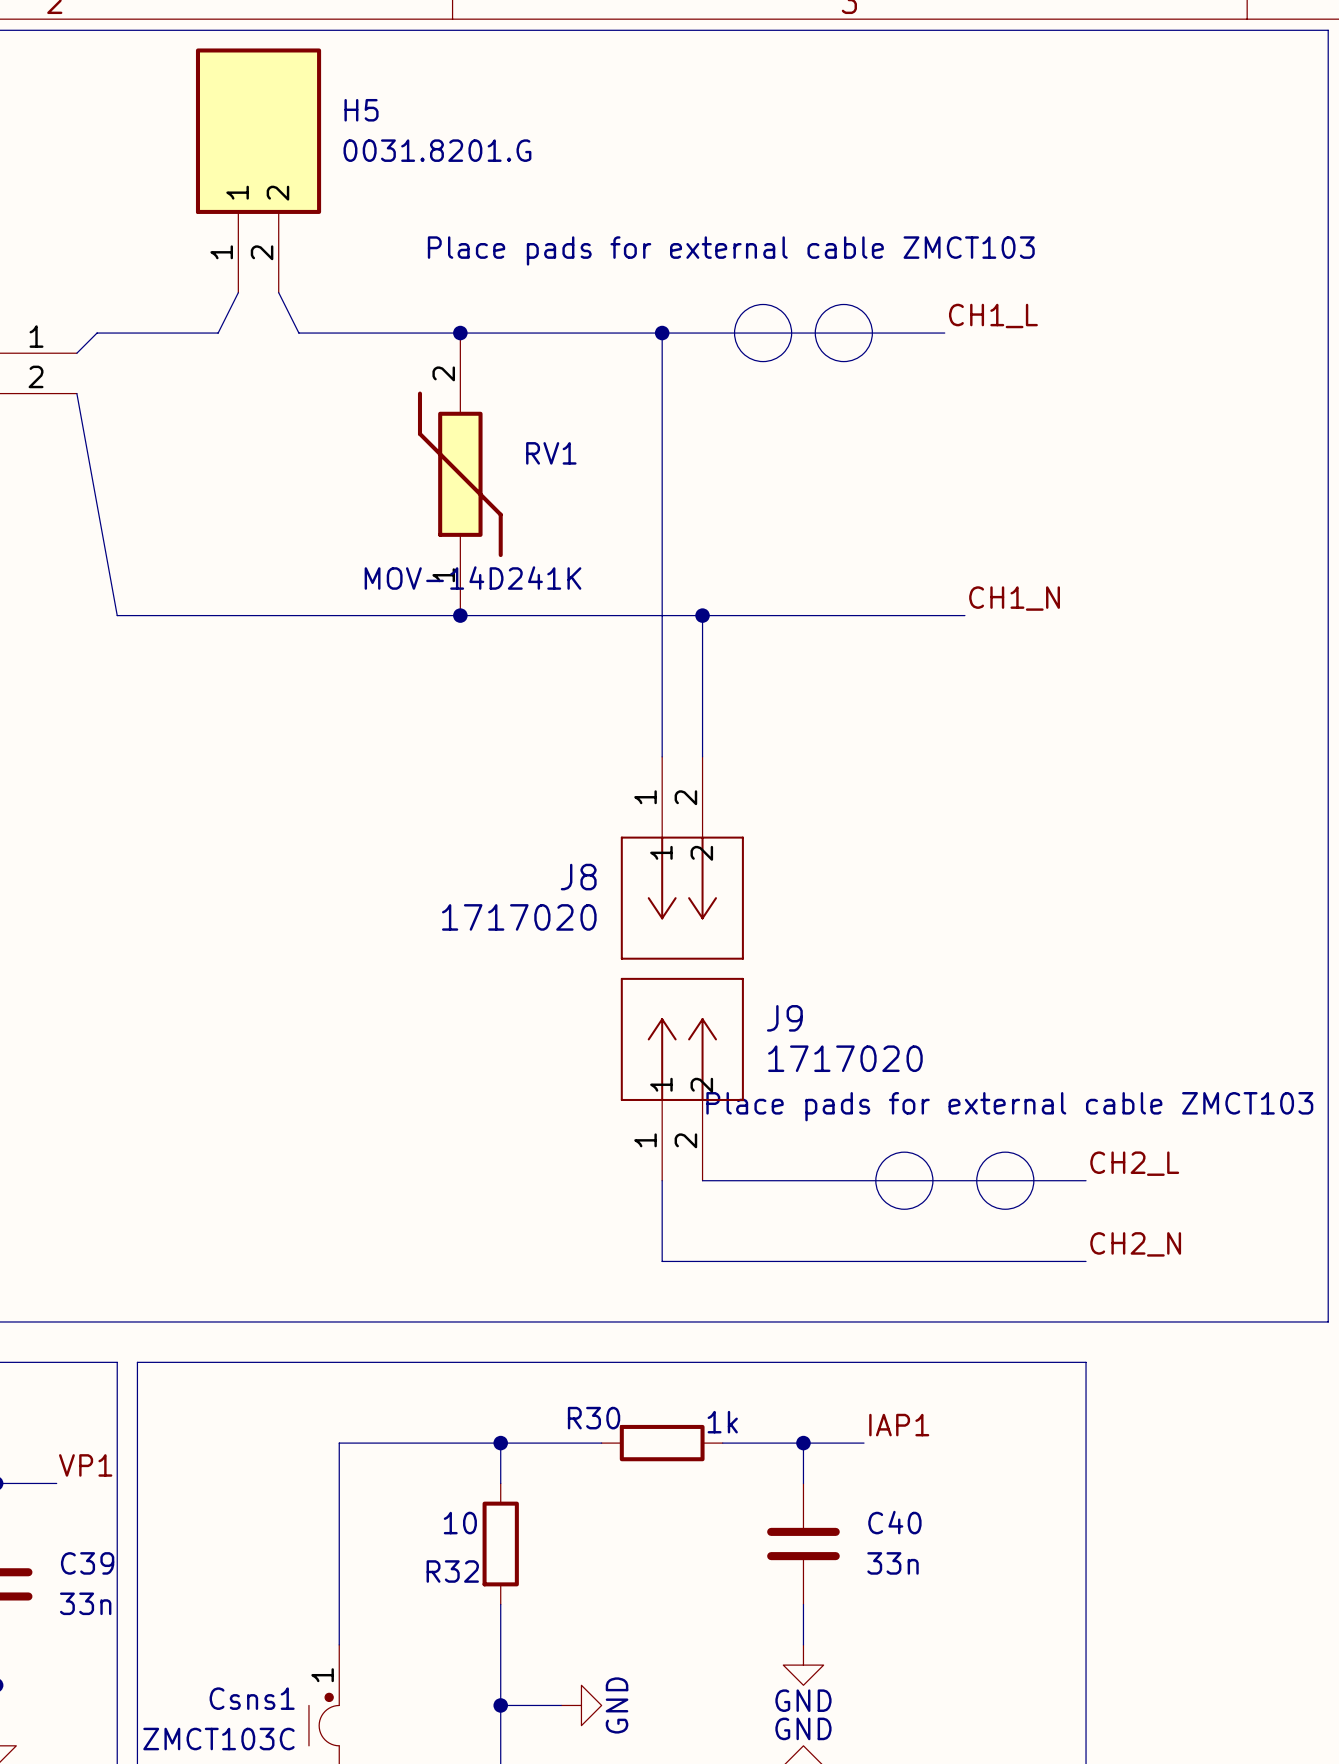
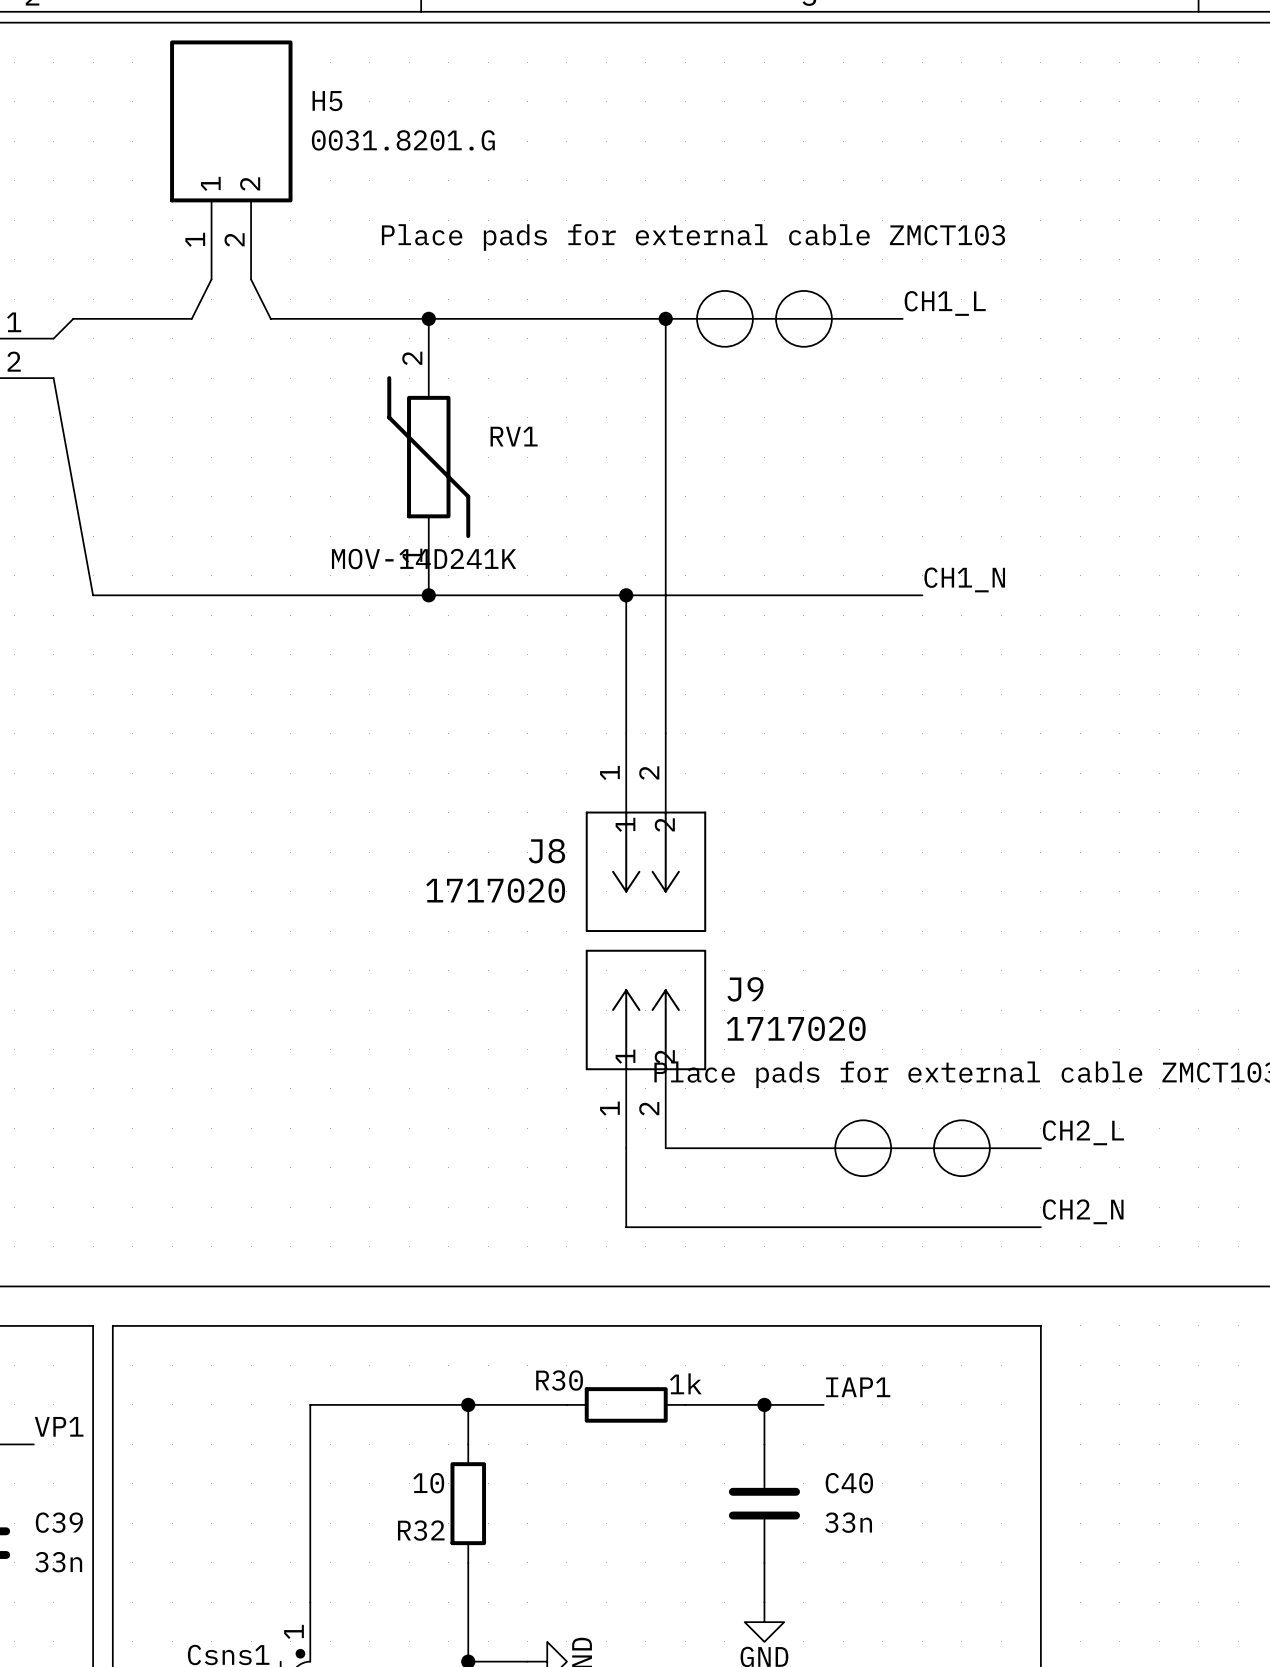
wire: (662, 333) (662, 615) -> (665, 318) (665, 595)
junction position: (662, 333) -> (665, 318)
junction position: (702, 615) -> (626, 595)

